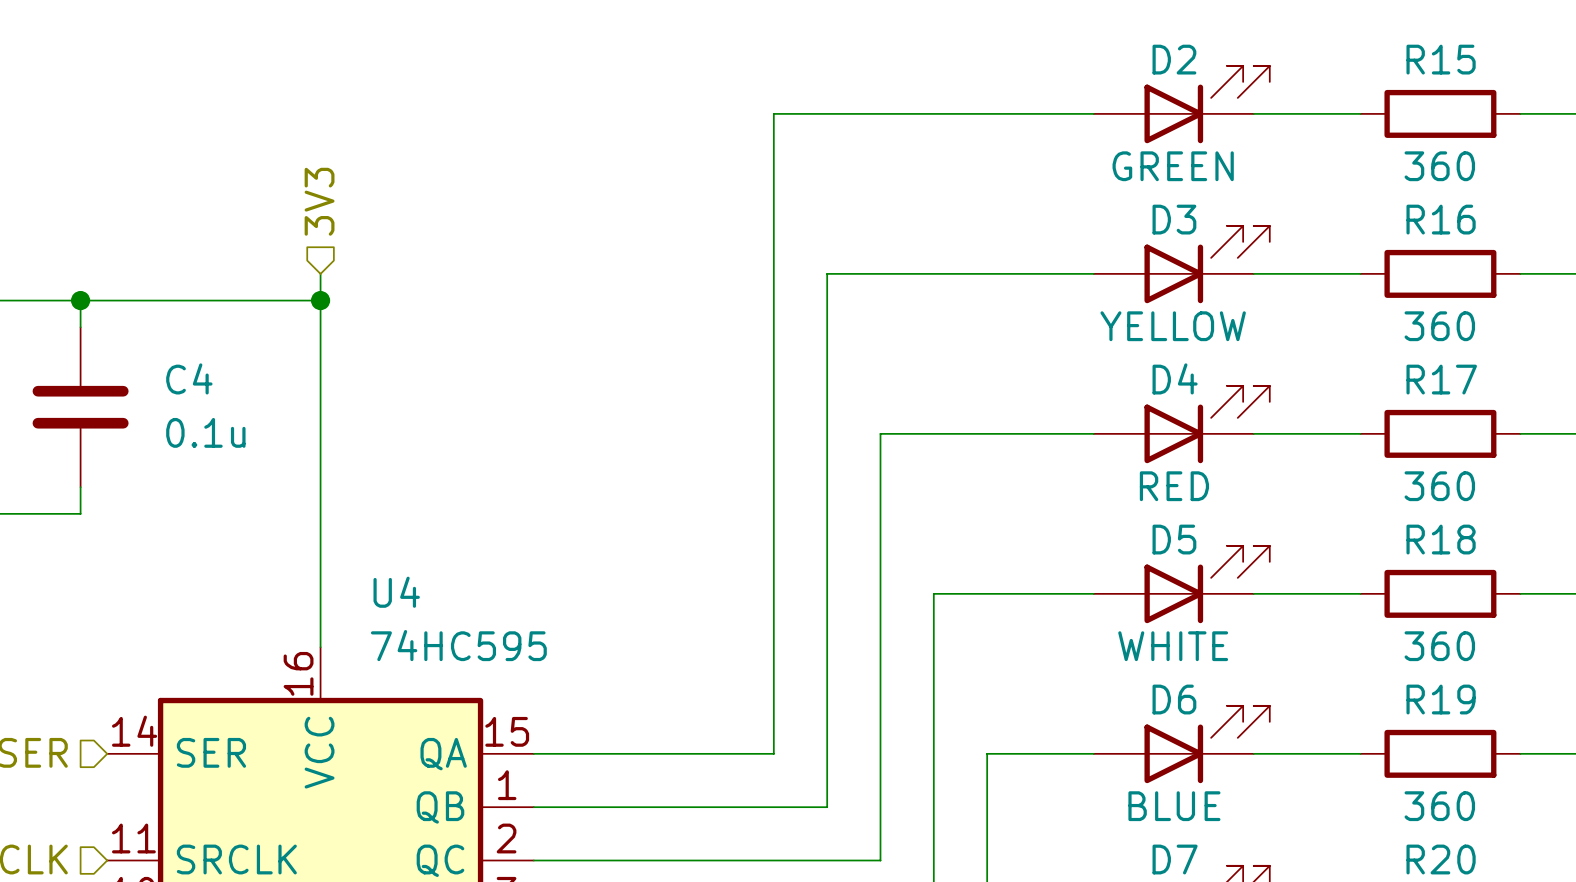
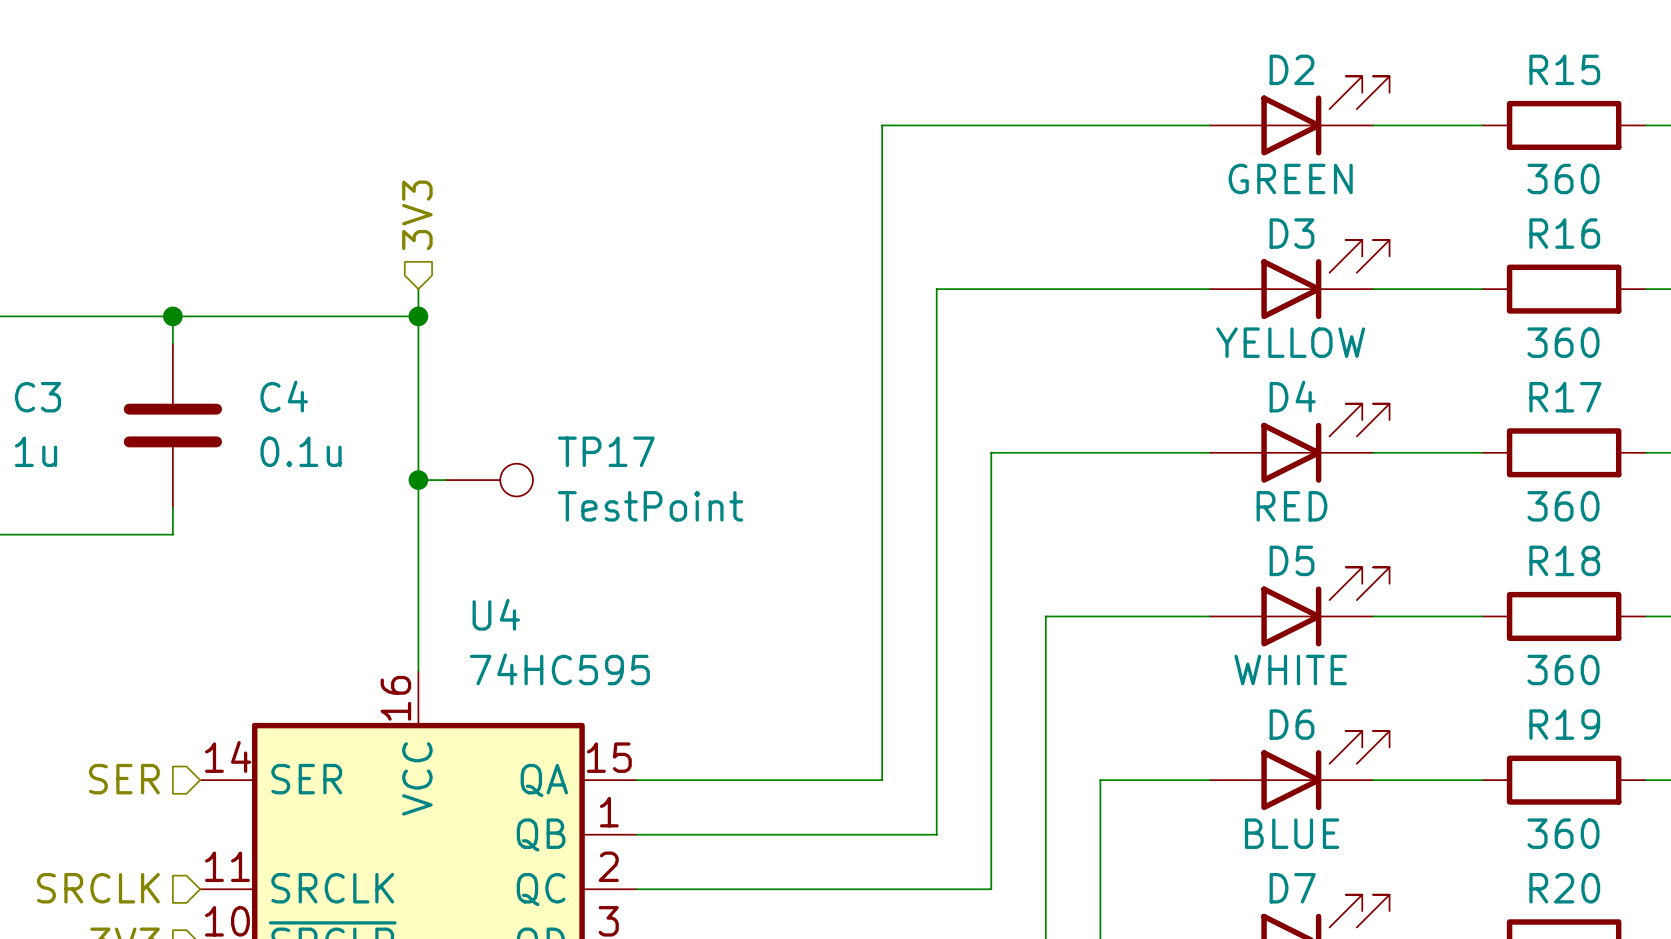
wire: none -> (418, 480) (445, 480)
junction: none -> (418, 480)
TP17: none -> TestPoint (489, 480)

